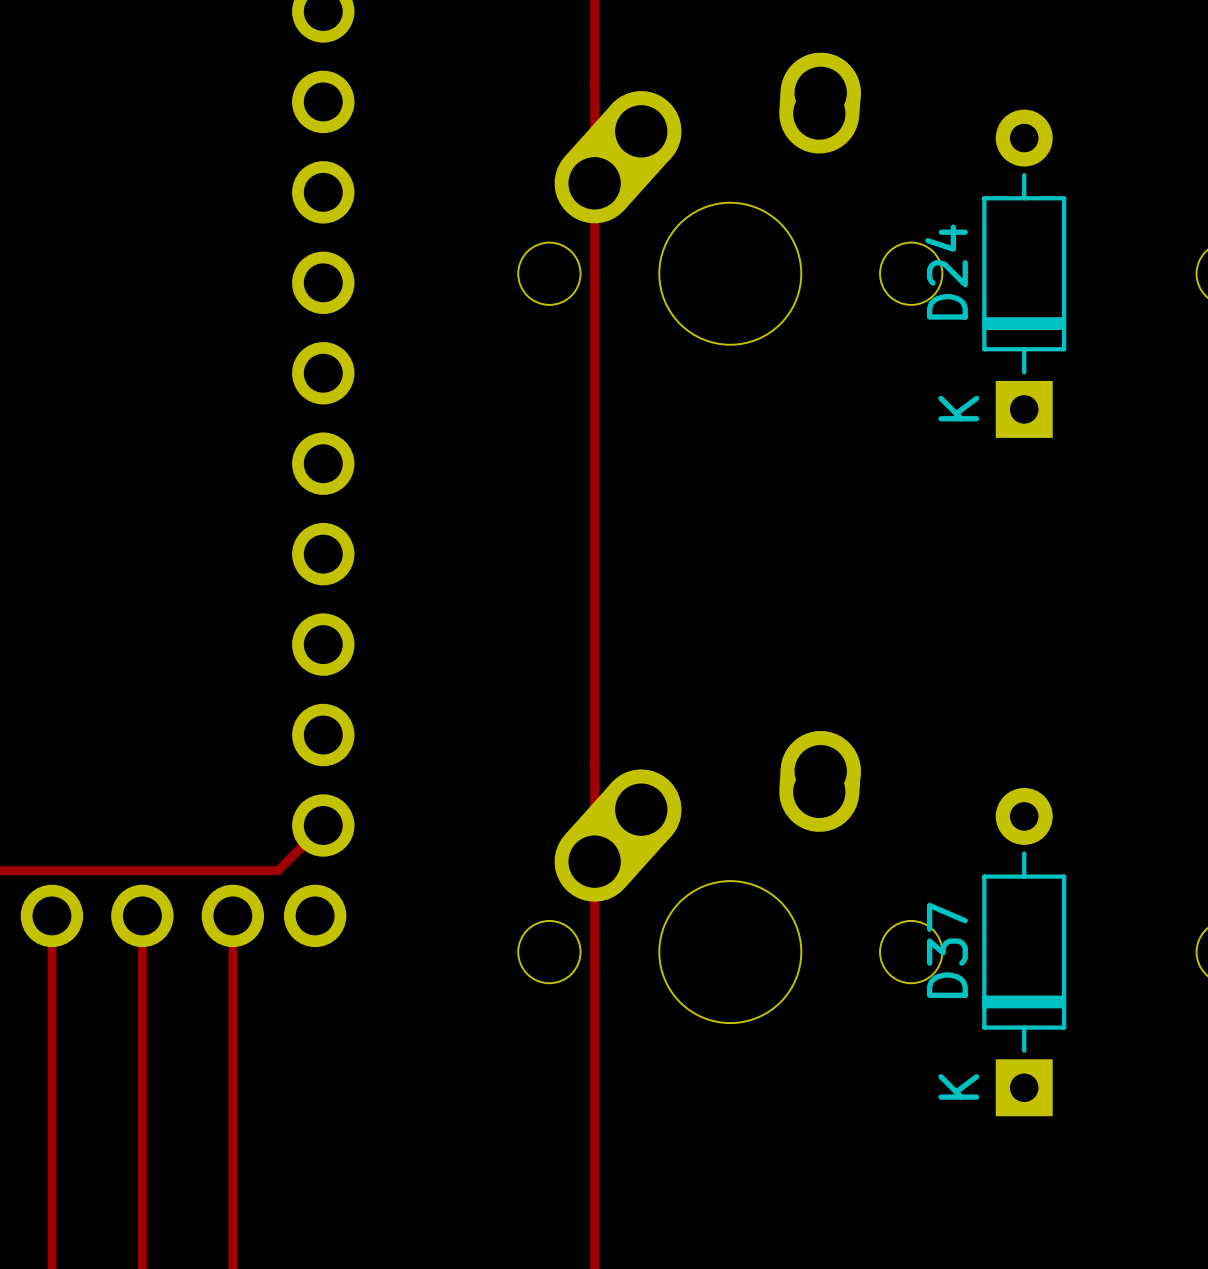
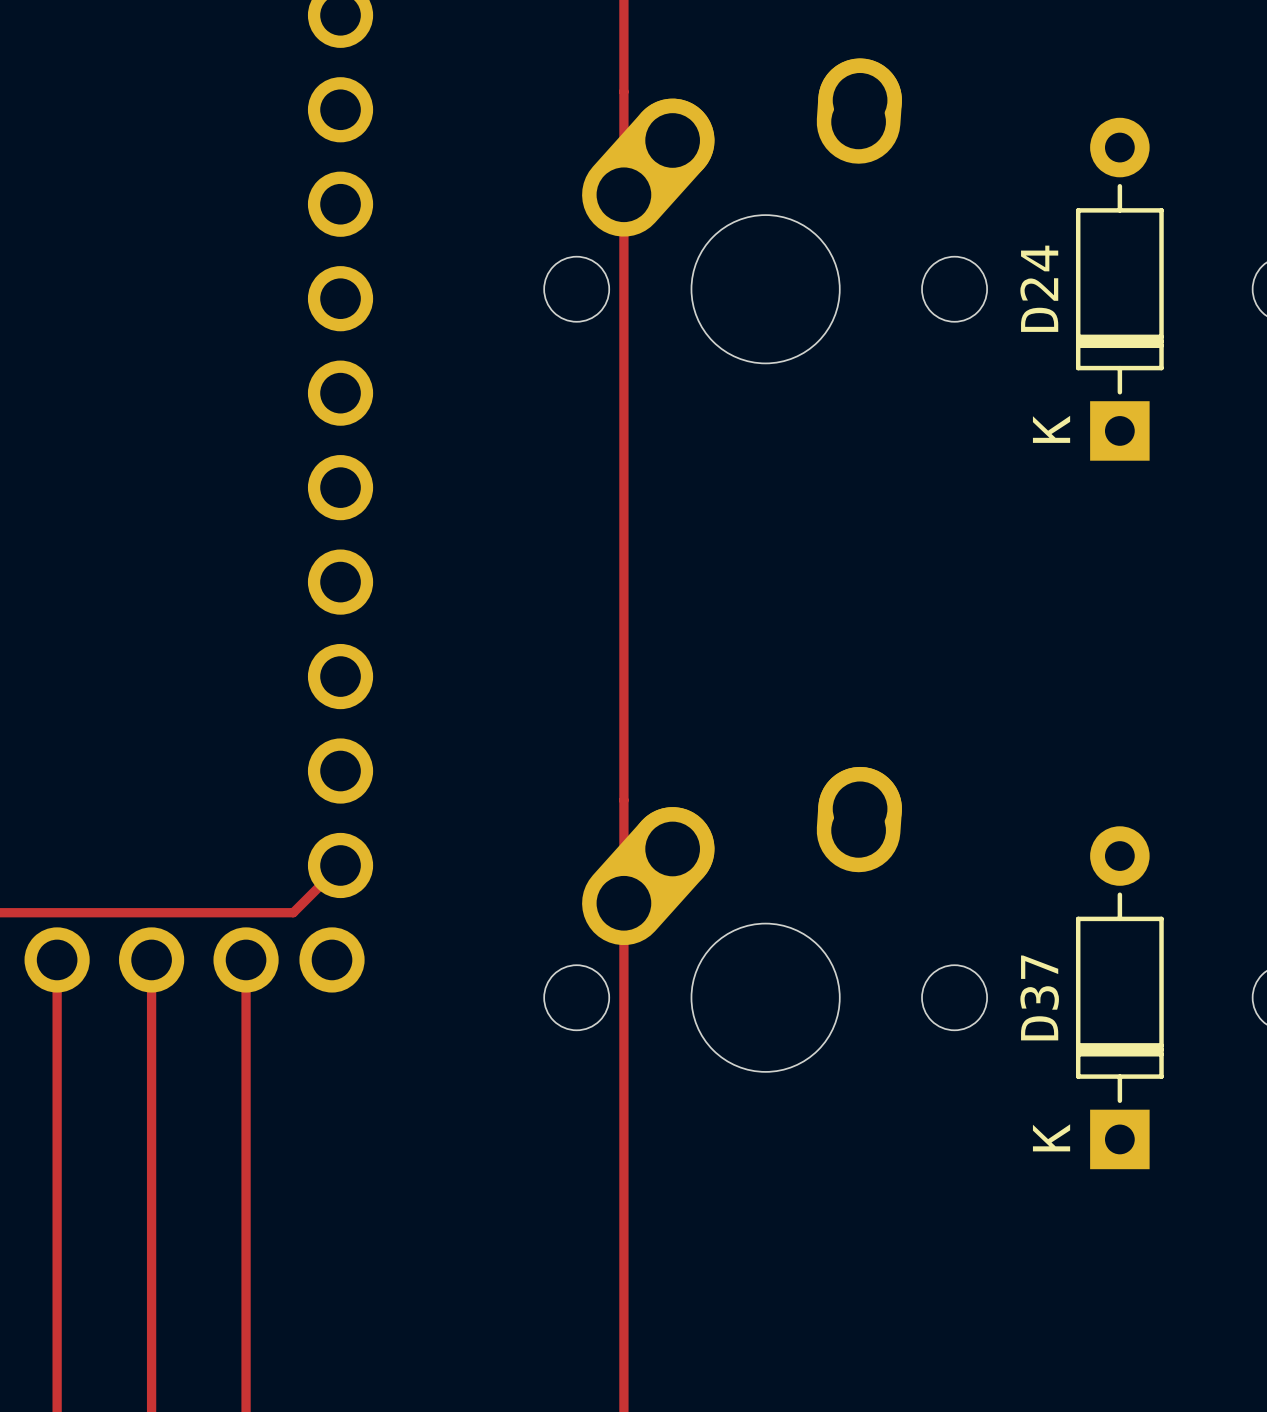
D24 position: (1024, 273) -> (1119, 289)
D37 position: (1024, 952) -> (1119, 997)

